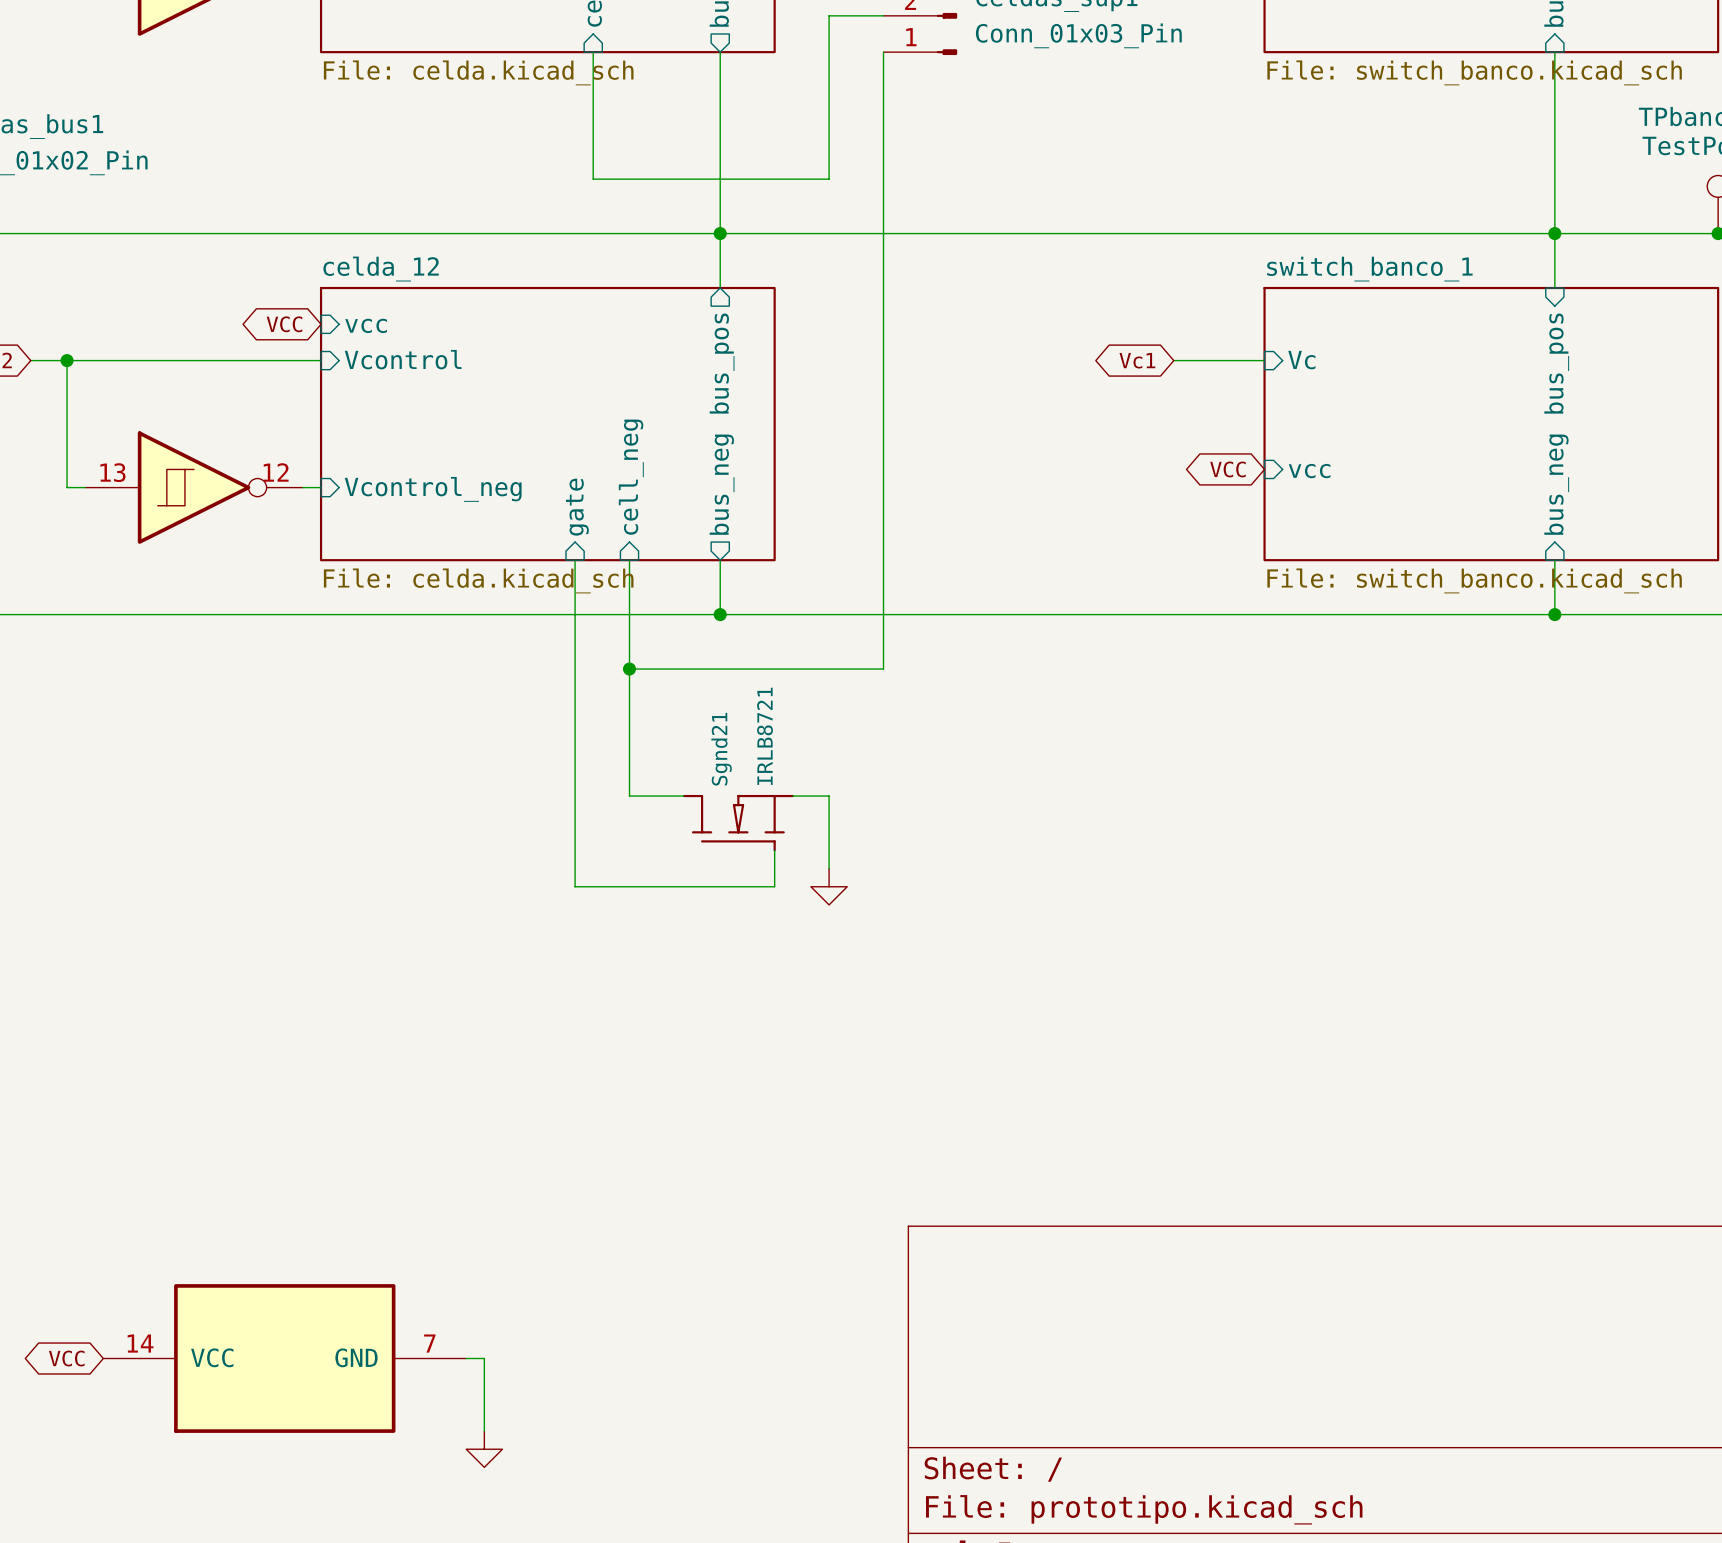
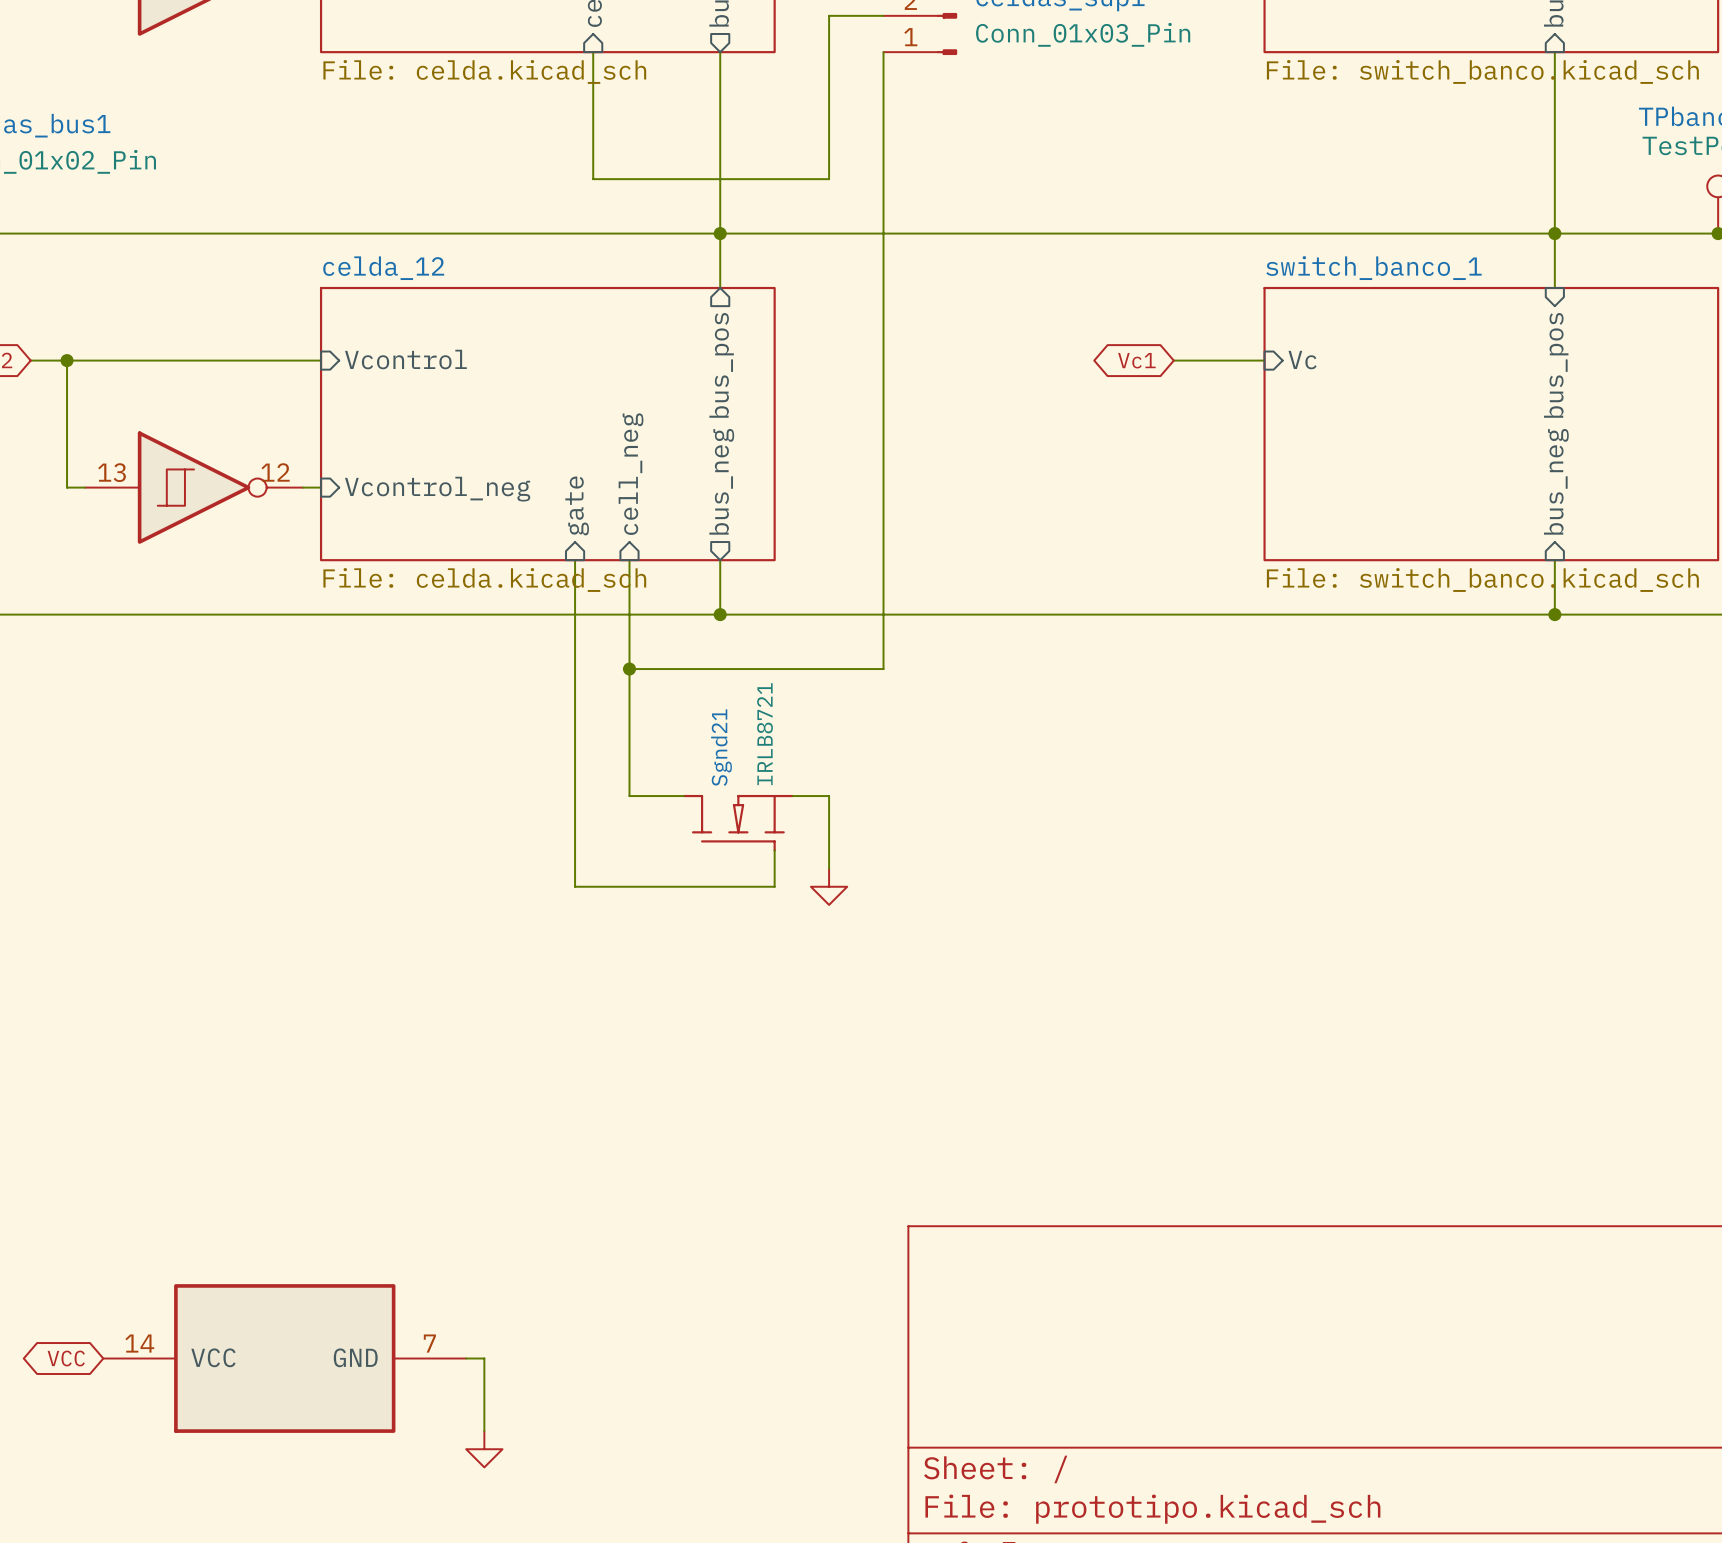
global label: VCC (284, 324) -> none
sheet pin: vcc (366, 325) -> none
global label: VCC (1227, 469) -> none
sheet pin: vcc (1309, 471) -> none

